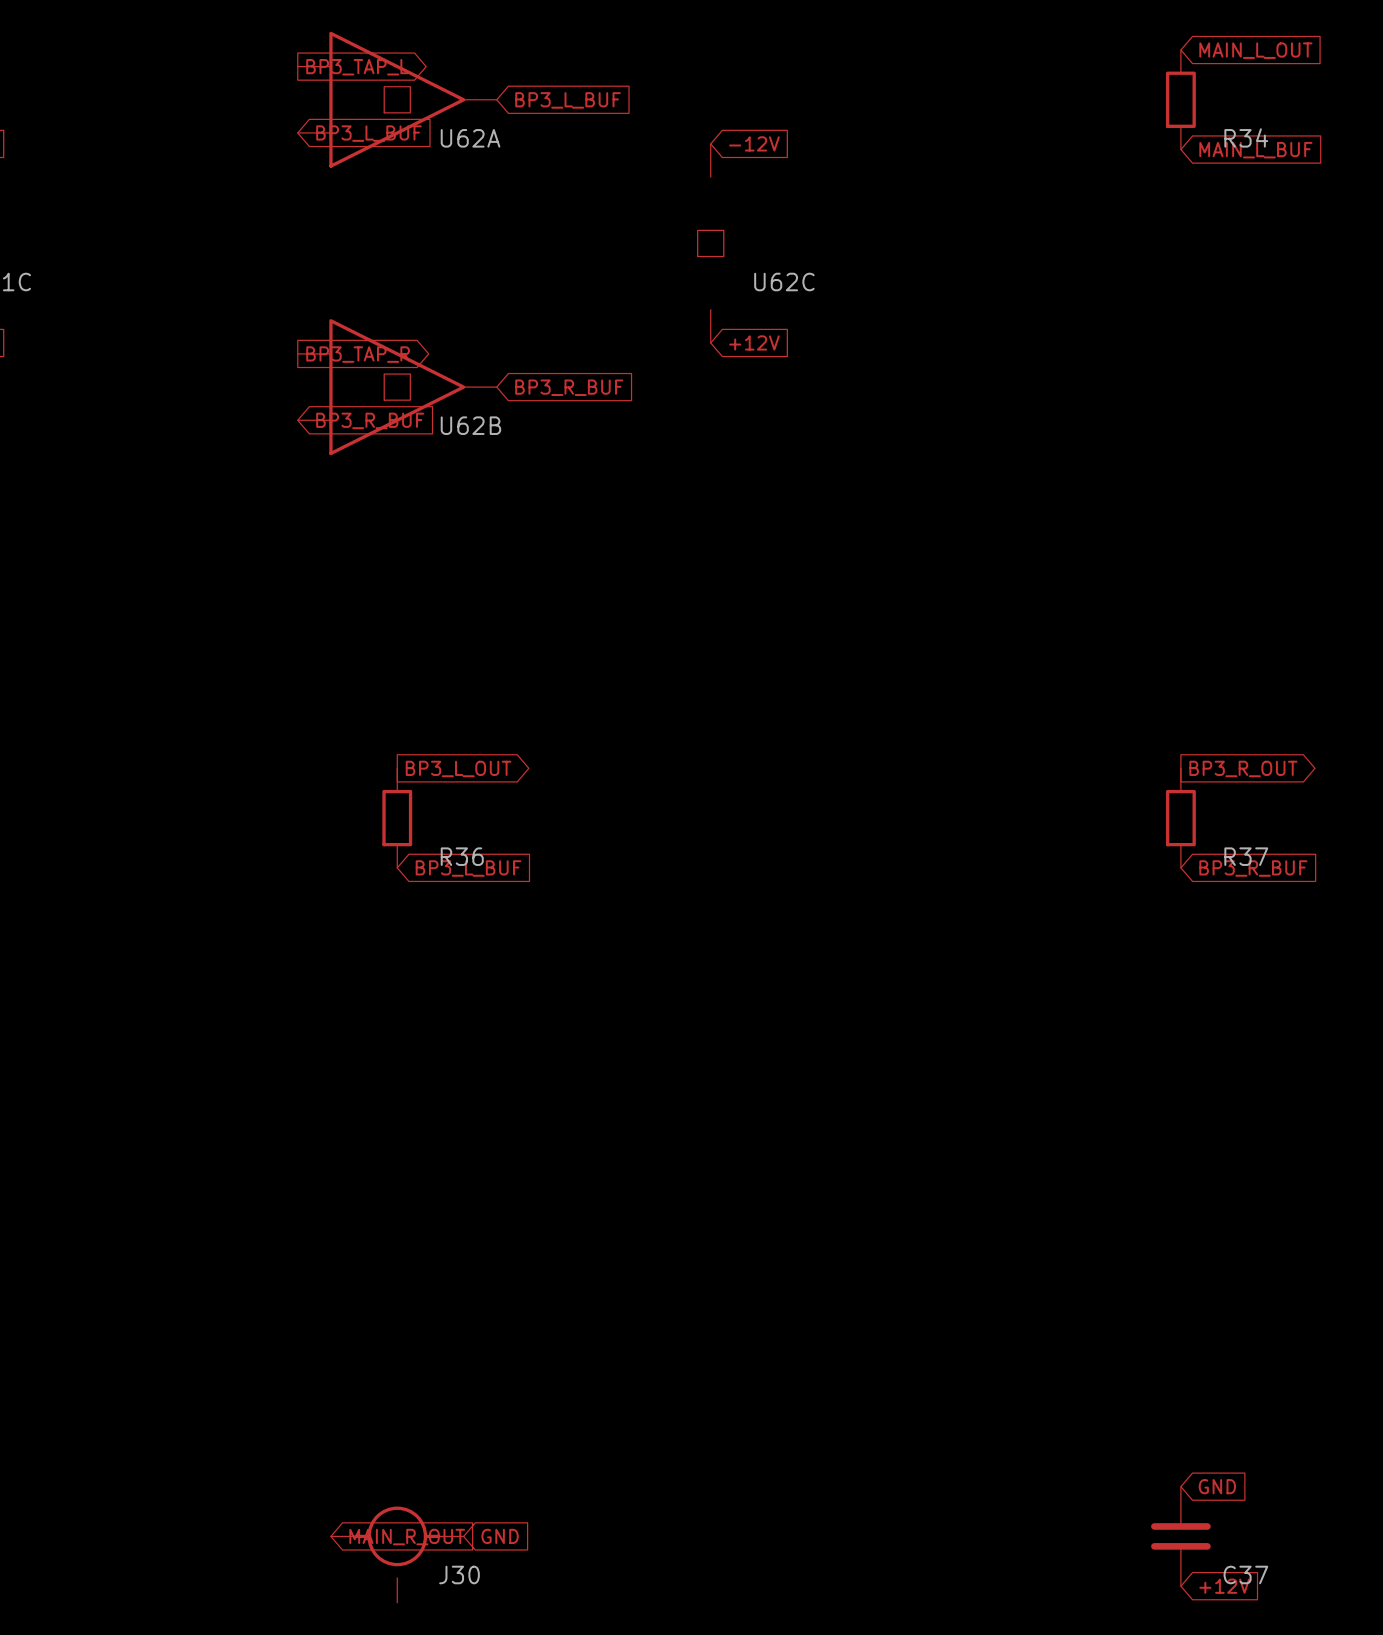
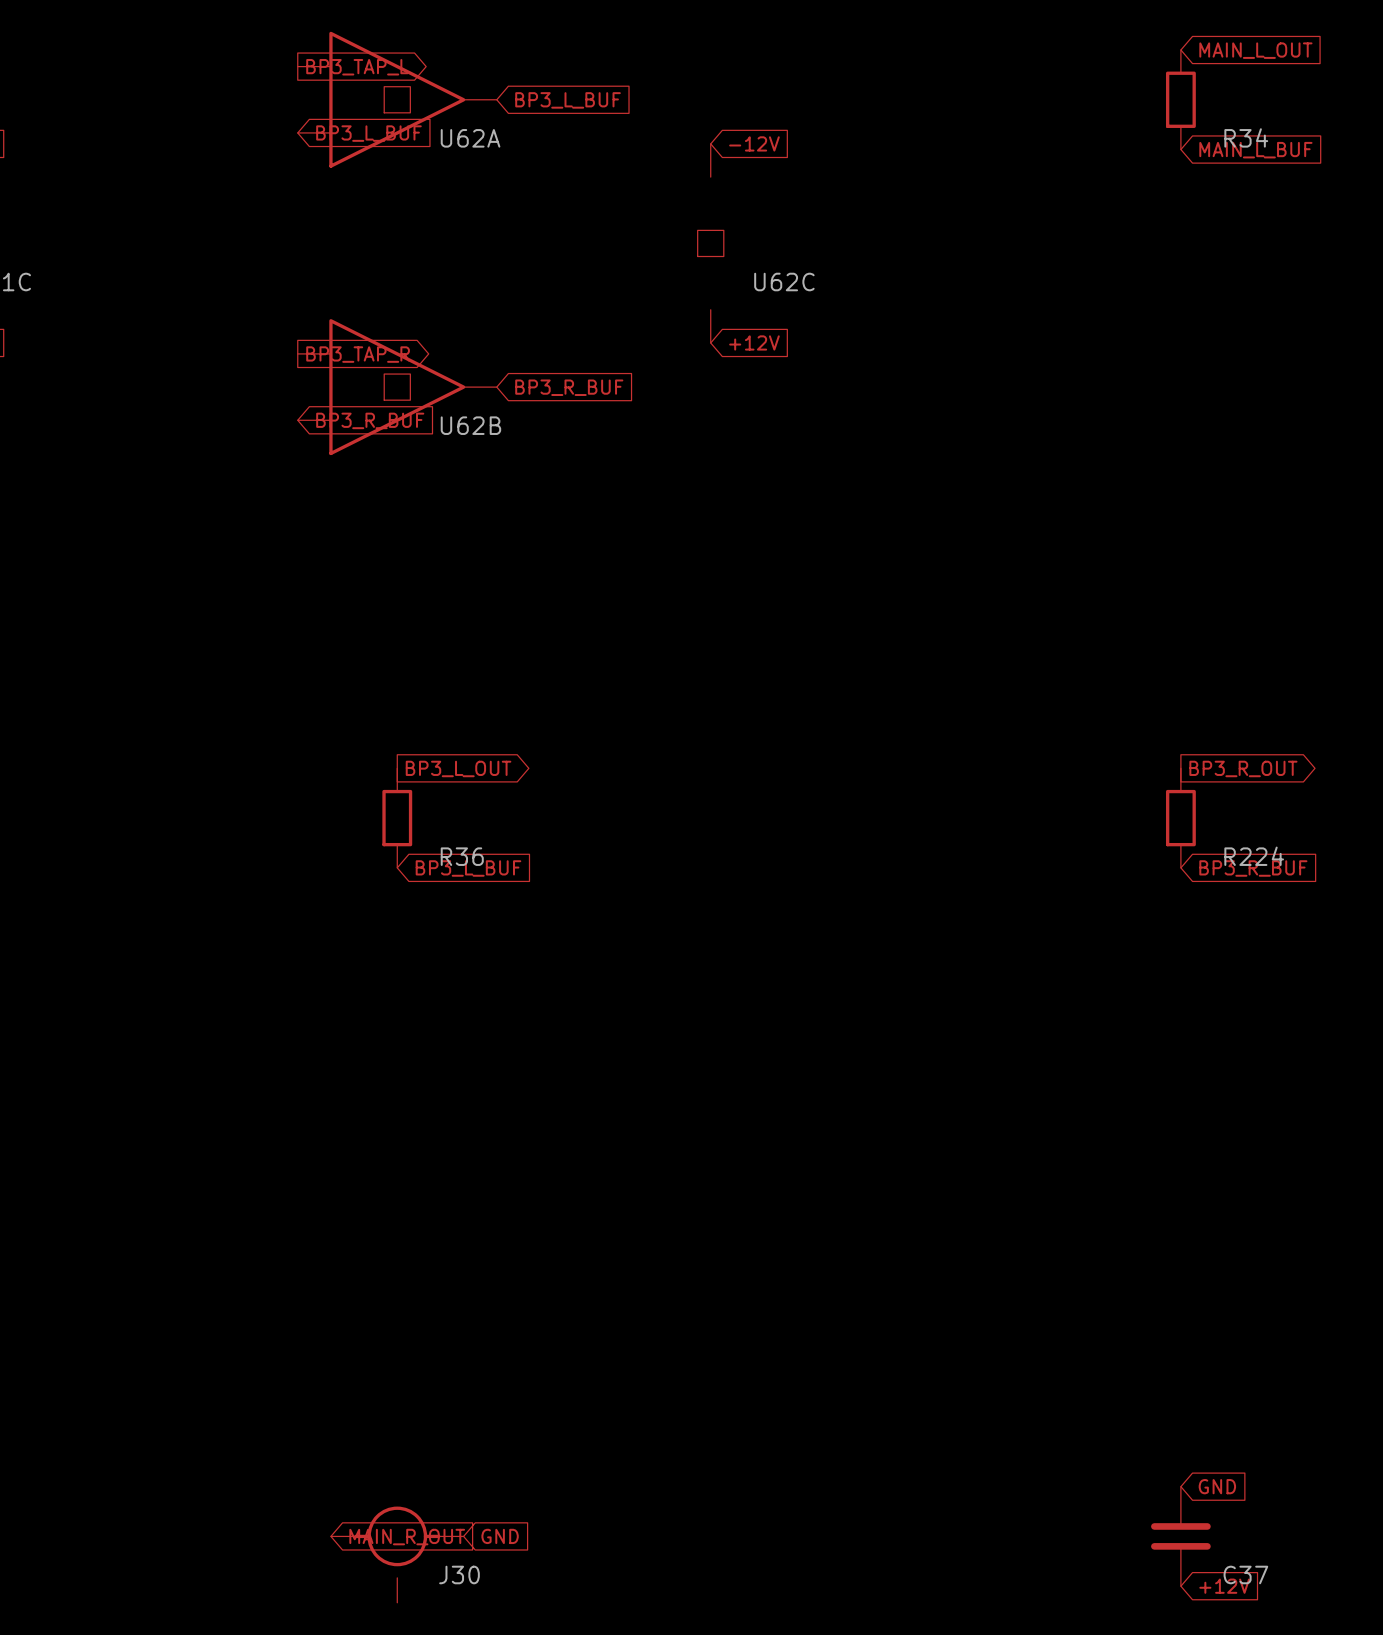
R37 name: R37 (1246, 856) -> R224 (1254, 856)

